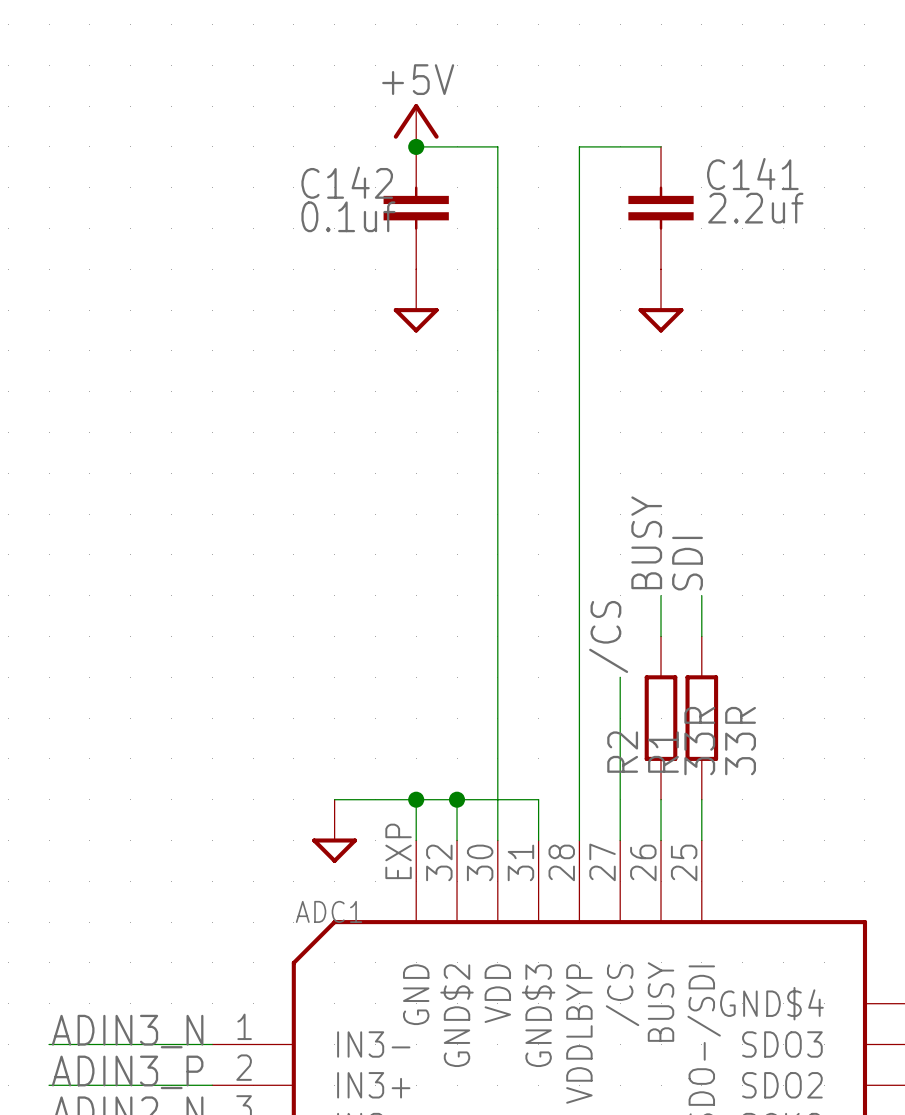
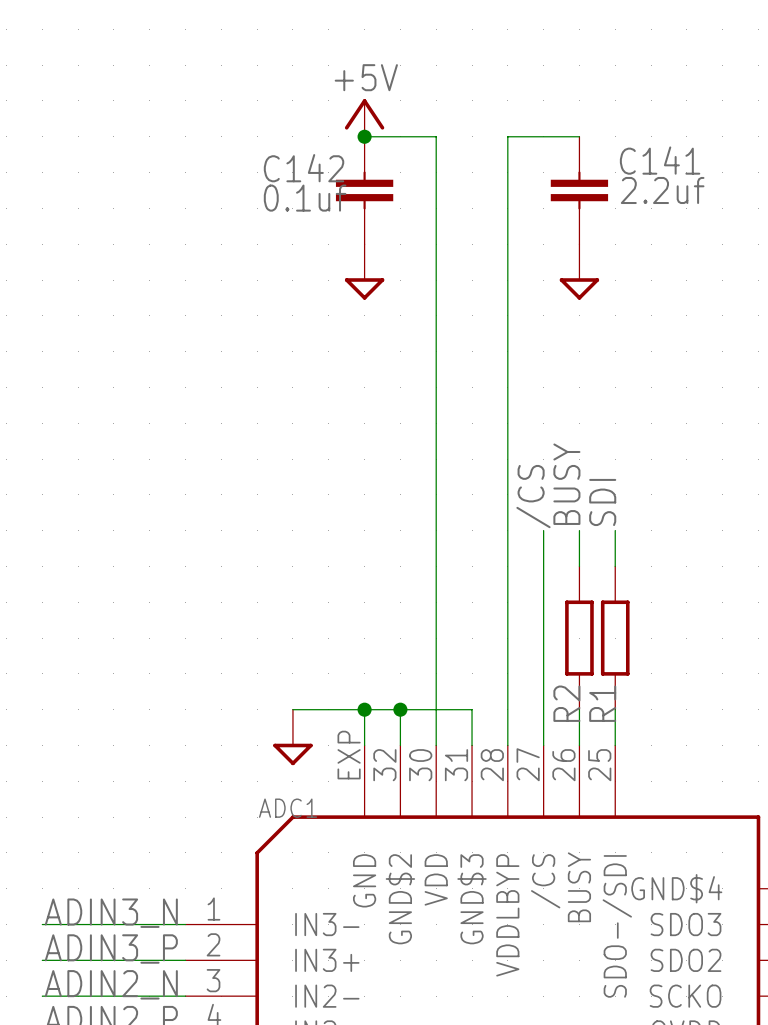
wire: none -> (543, 530) (543, 602)
label position: /CS (608, 636) -> /CS (533, 496)
R2 value: 33R (699, 741) -> none
R1 value: 33R (740, 741) -> none
R2 name position: R2 (622, 752) -> R2 (566, 703)
R1 name position: R1 (663, 752) -> R1 (602, 703)

